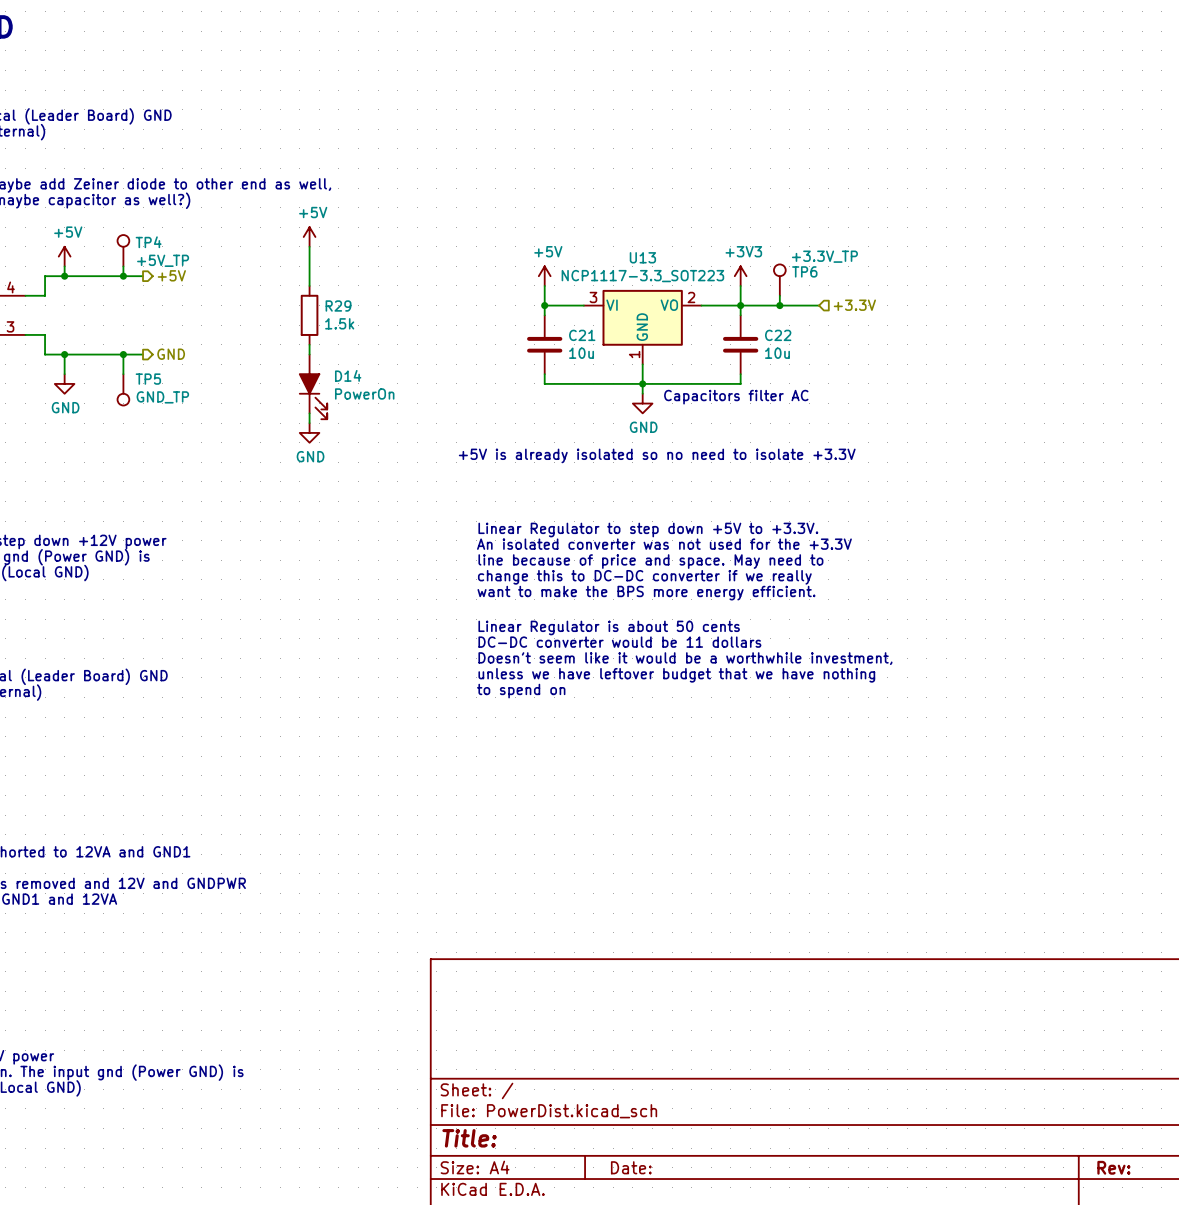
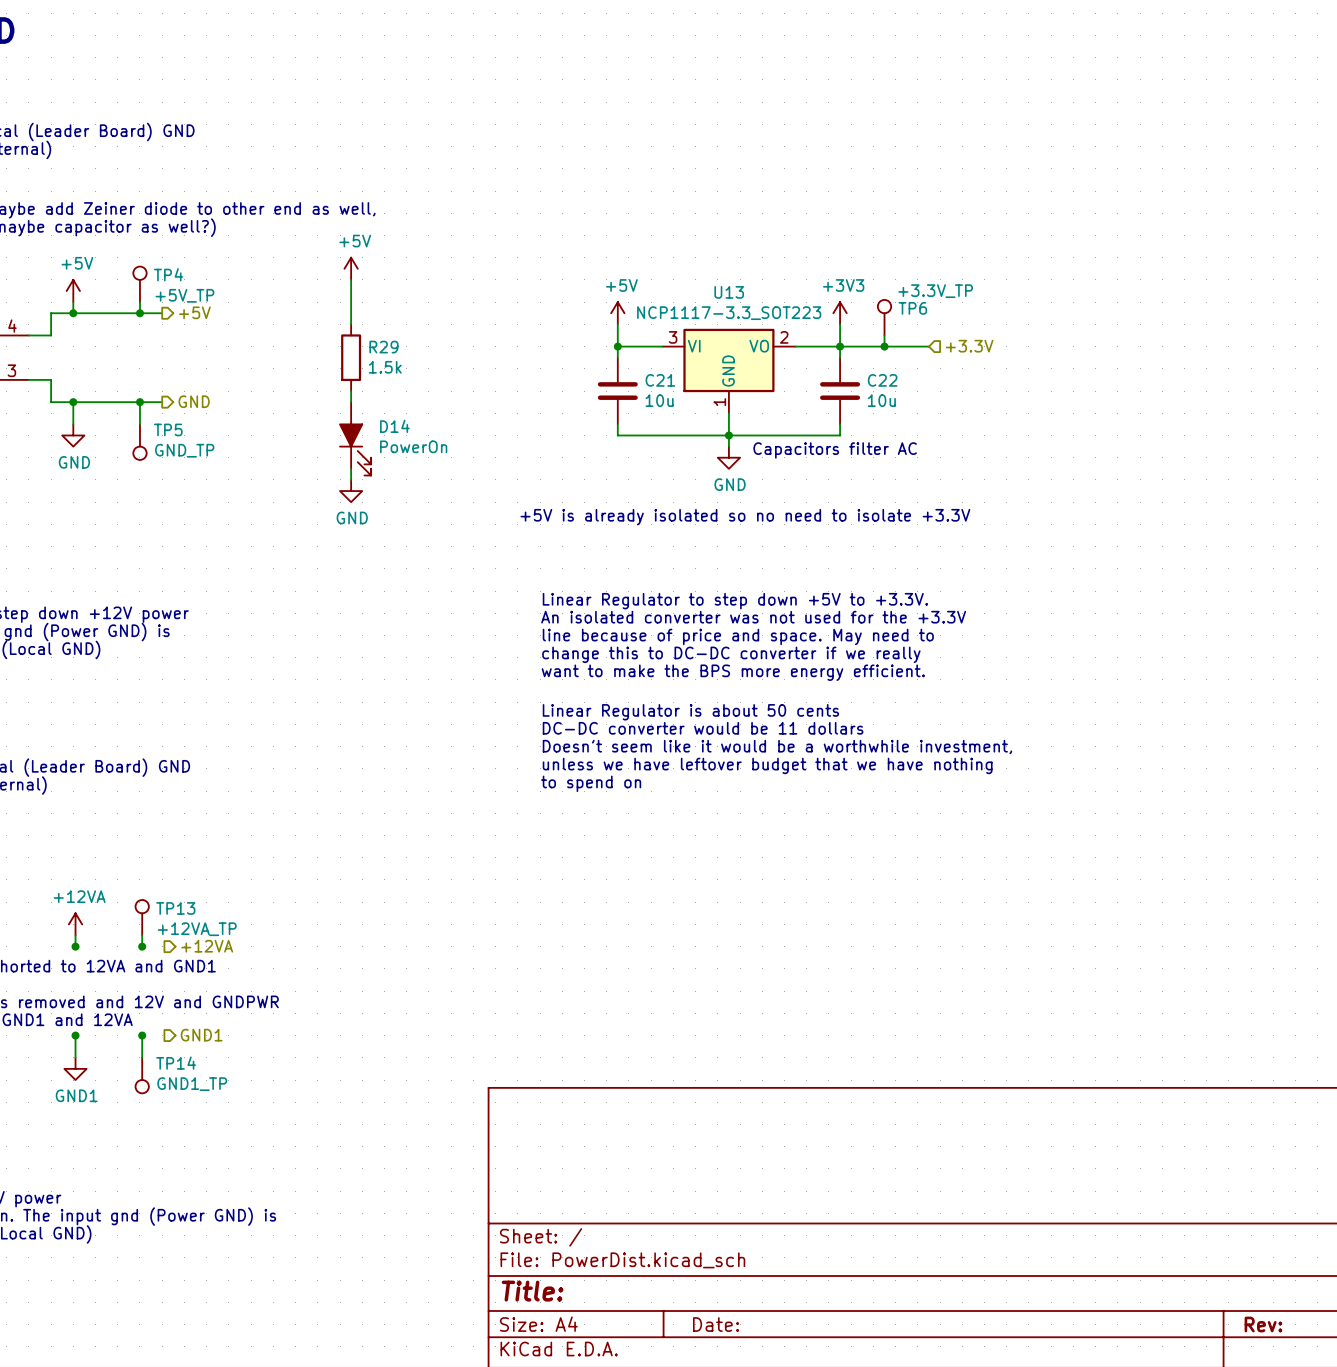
TP13: none -> +12VA_TP (142, 917)
power symbol: none -> +12VA (75, 924)
wire: none -> (75, 935) (75, 946)
wire: none -> (142, 935) (142, 946)
junction: none -> (75, 946)
junction: none -> (142, 946)
hierarchical label: none -> +12VA (207, 946)
hierarchical label: none -> GND1 (201, 1035)
wire: none -> (75, 1035) (75, 1057)
junction: none -> (75, 1035)
wire: none -> (142, 1035) (142, 1057)
junction: none -> (142, 1035)
power symbol: none -> GND1 (75, 1068)
TP14: none -> GND1_TP (142, 1075)

